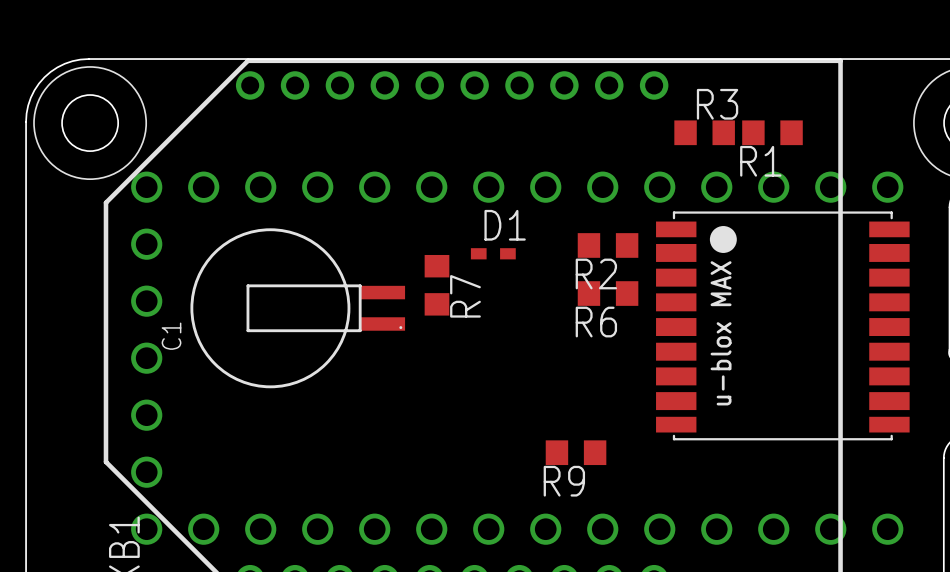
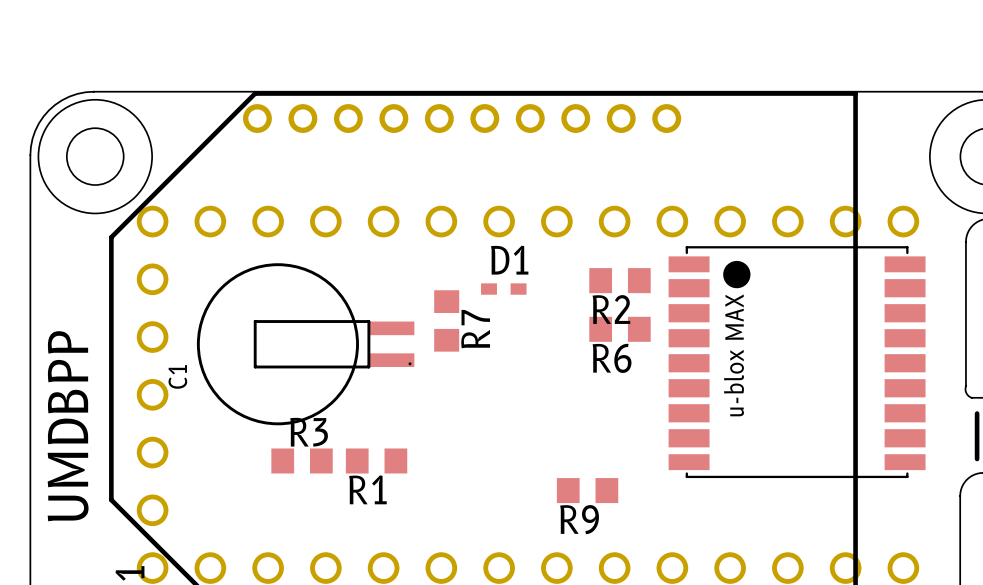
R3 position: (704, 132) -> (302, 460)
R1 position: (772, 132) -> (376, 460)
text: none -> UMDBPP (68, 426)

